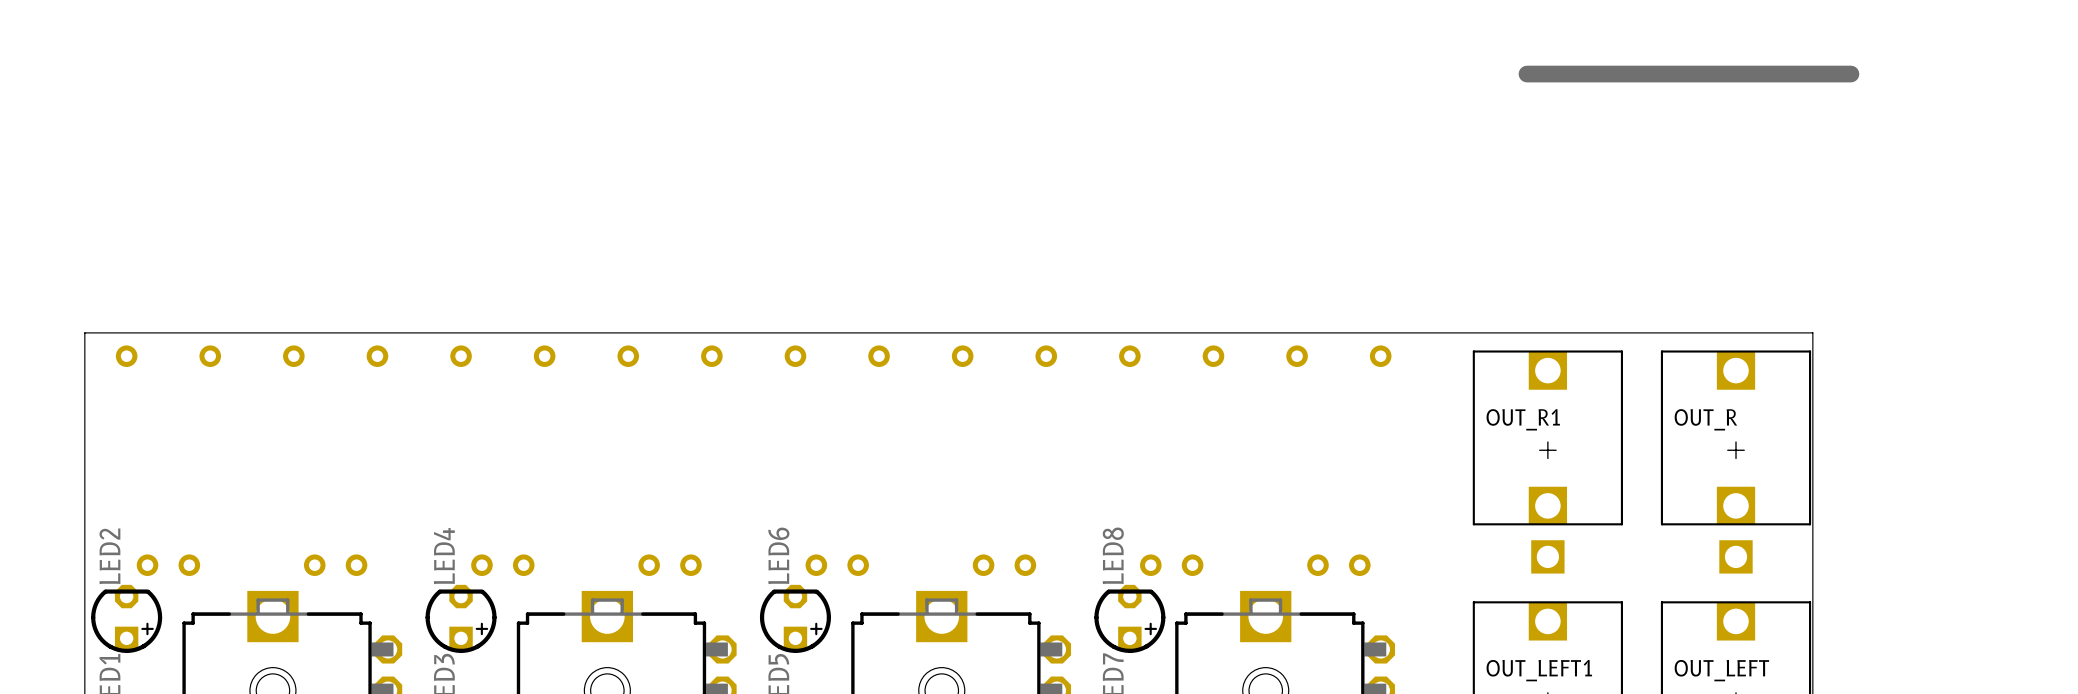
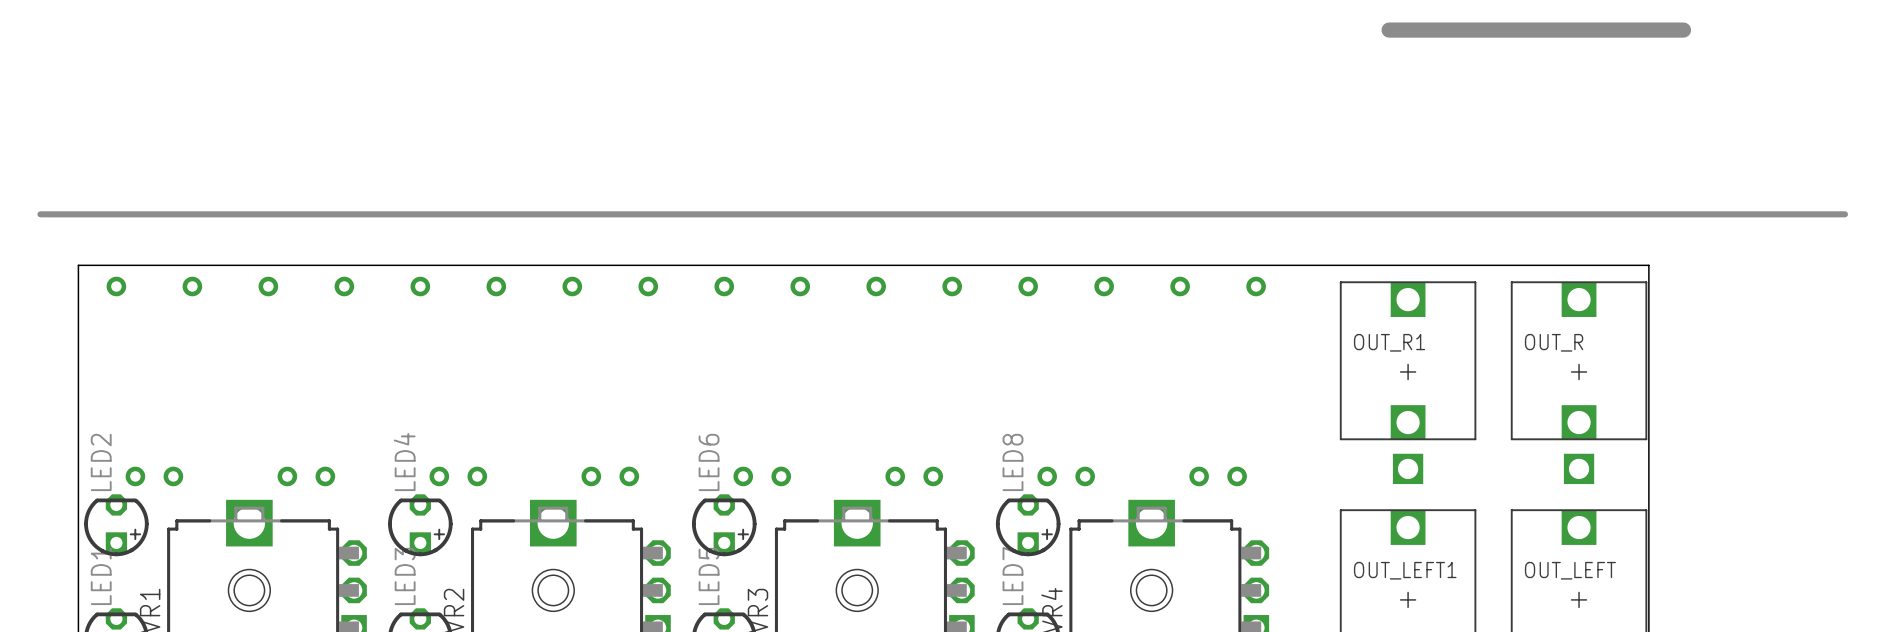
line: none -> (40, 214) (1844, 214)

